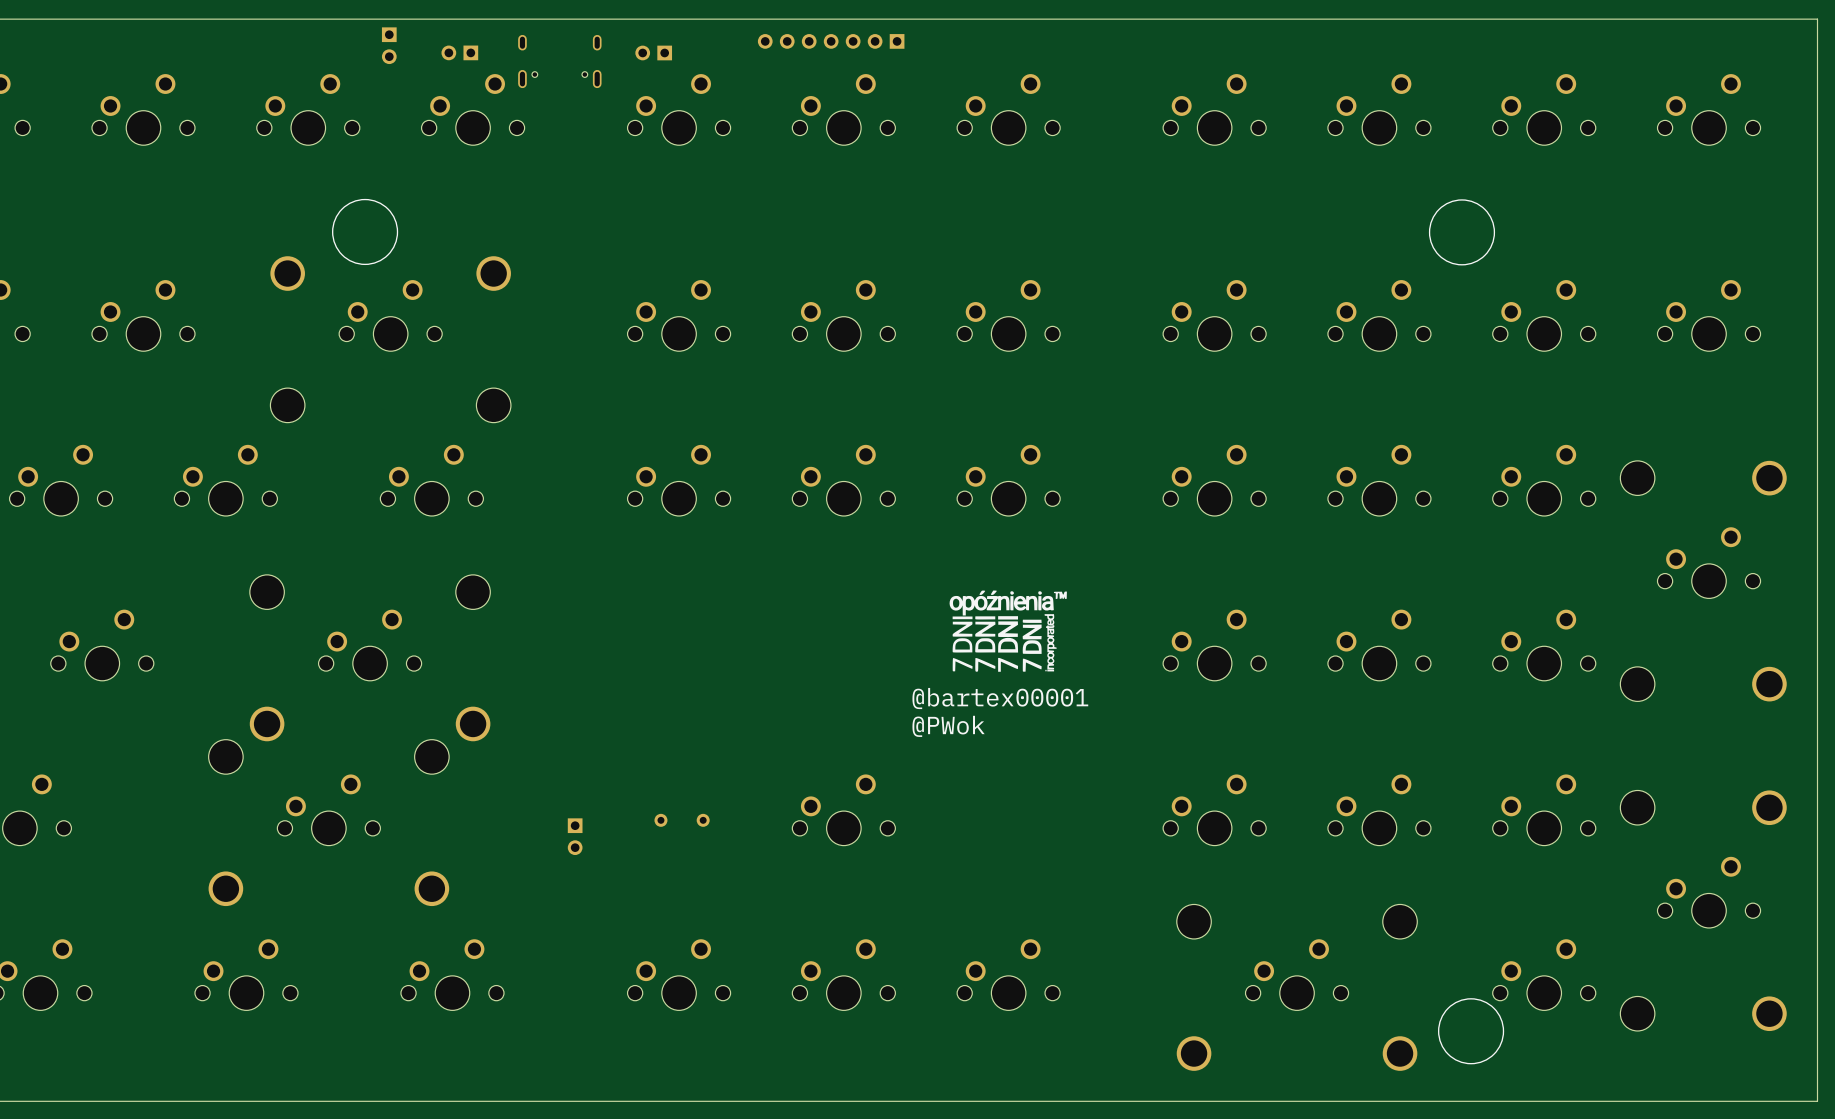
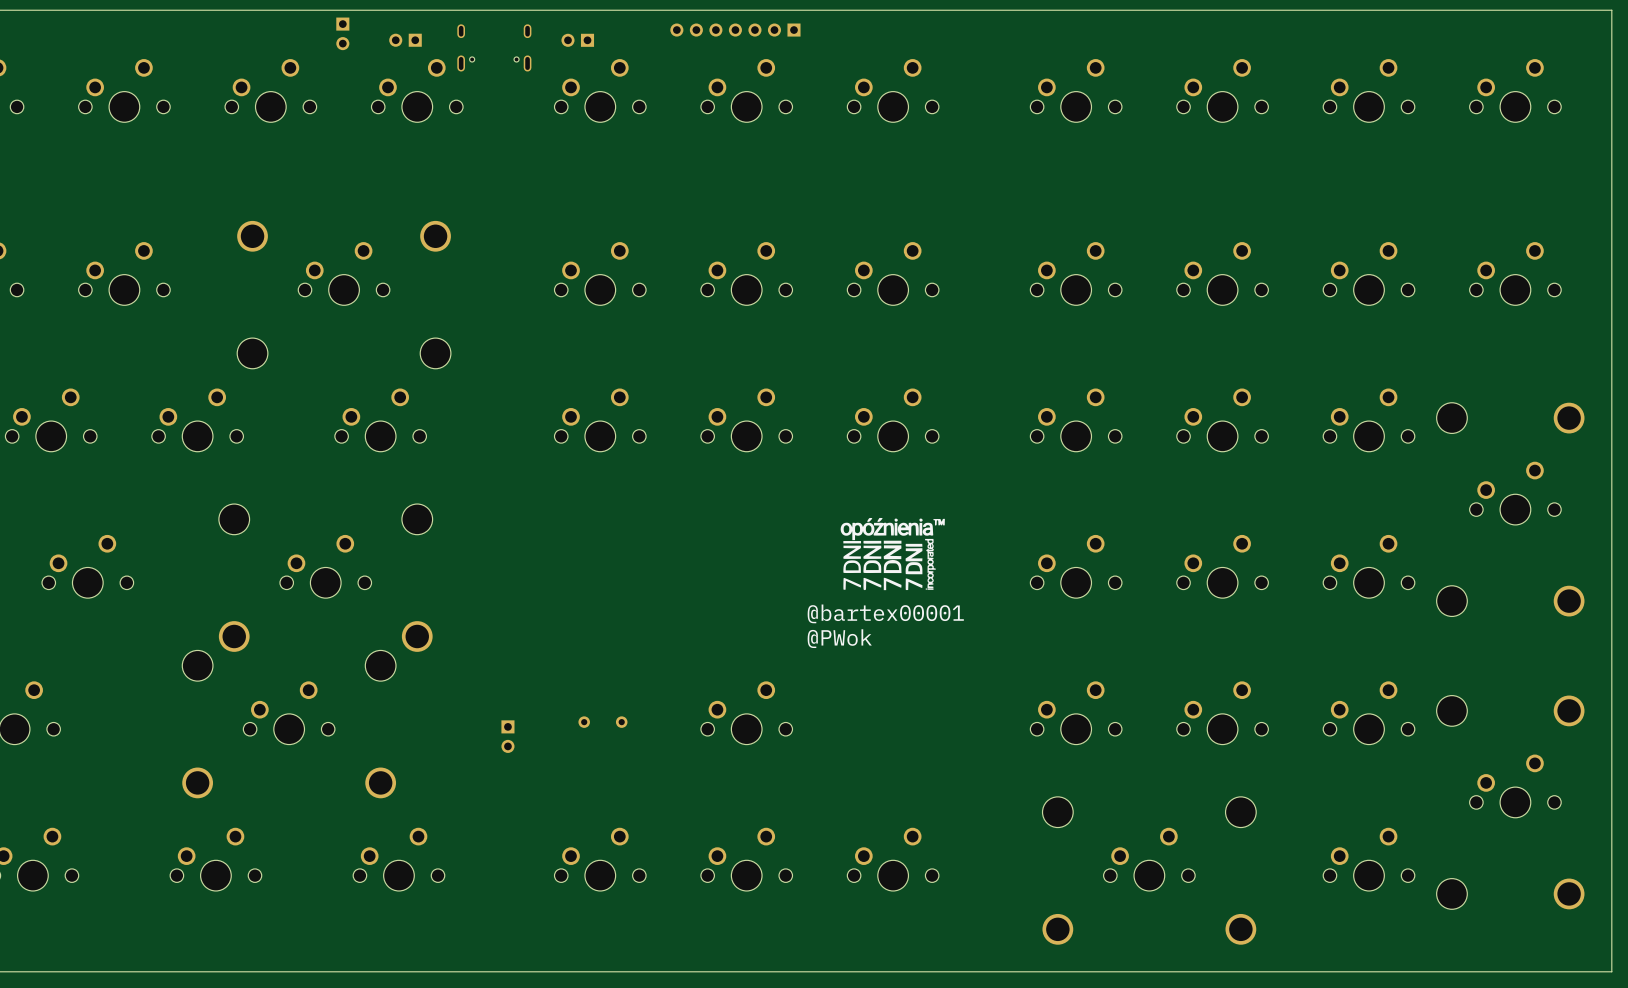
drawing: [332, 198, 399, 266] -> none
drawing: [1428, 199, 1496, 266] -> none
drawing: [1437, 998, 1505, 1065] -> none

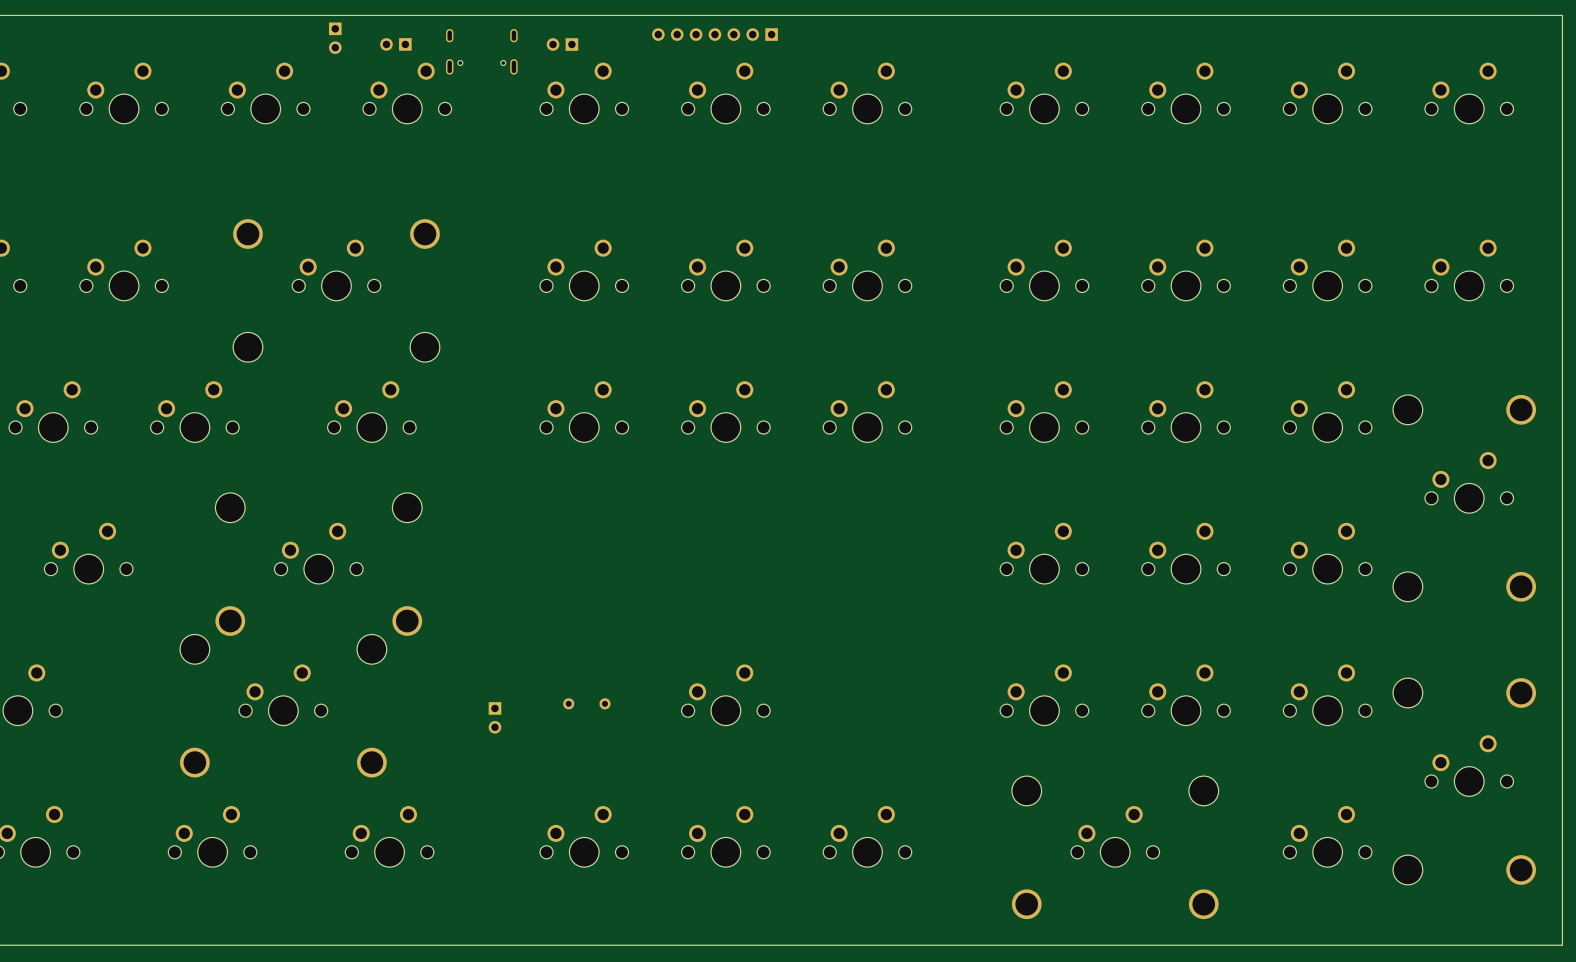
drawing: [840, 517, 945, 591] -> none
text: @bartex00001 (885, 613) -> none
text: @PWok (839, 638) -> none

